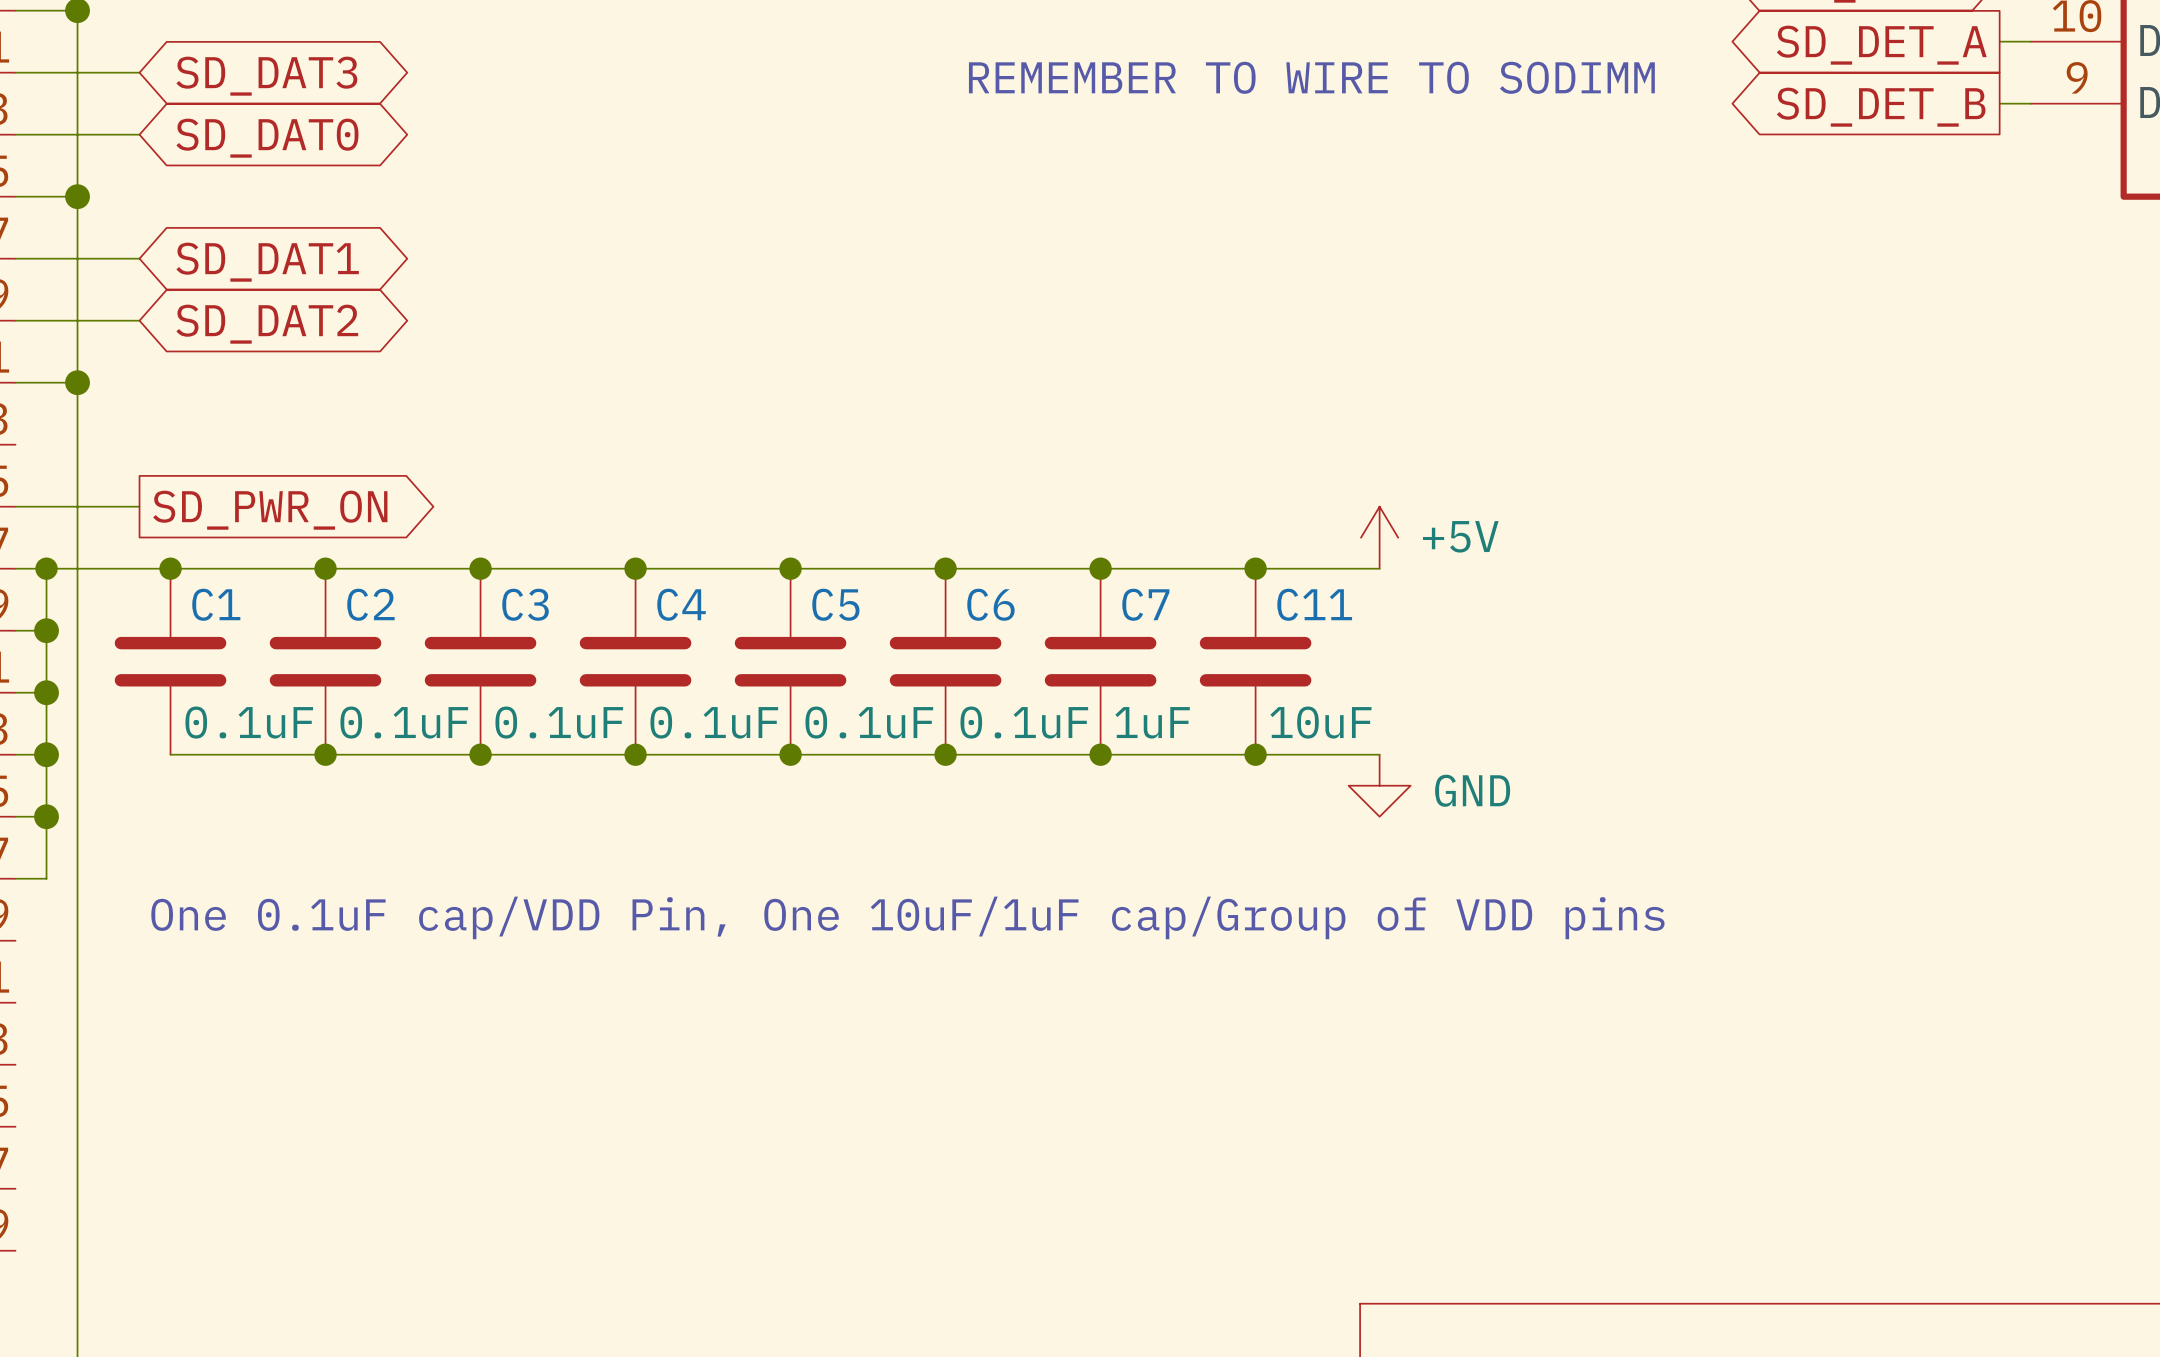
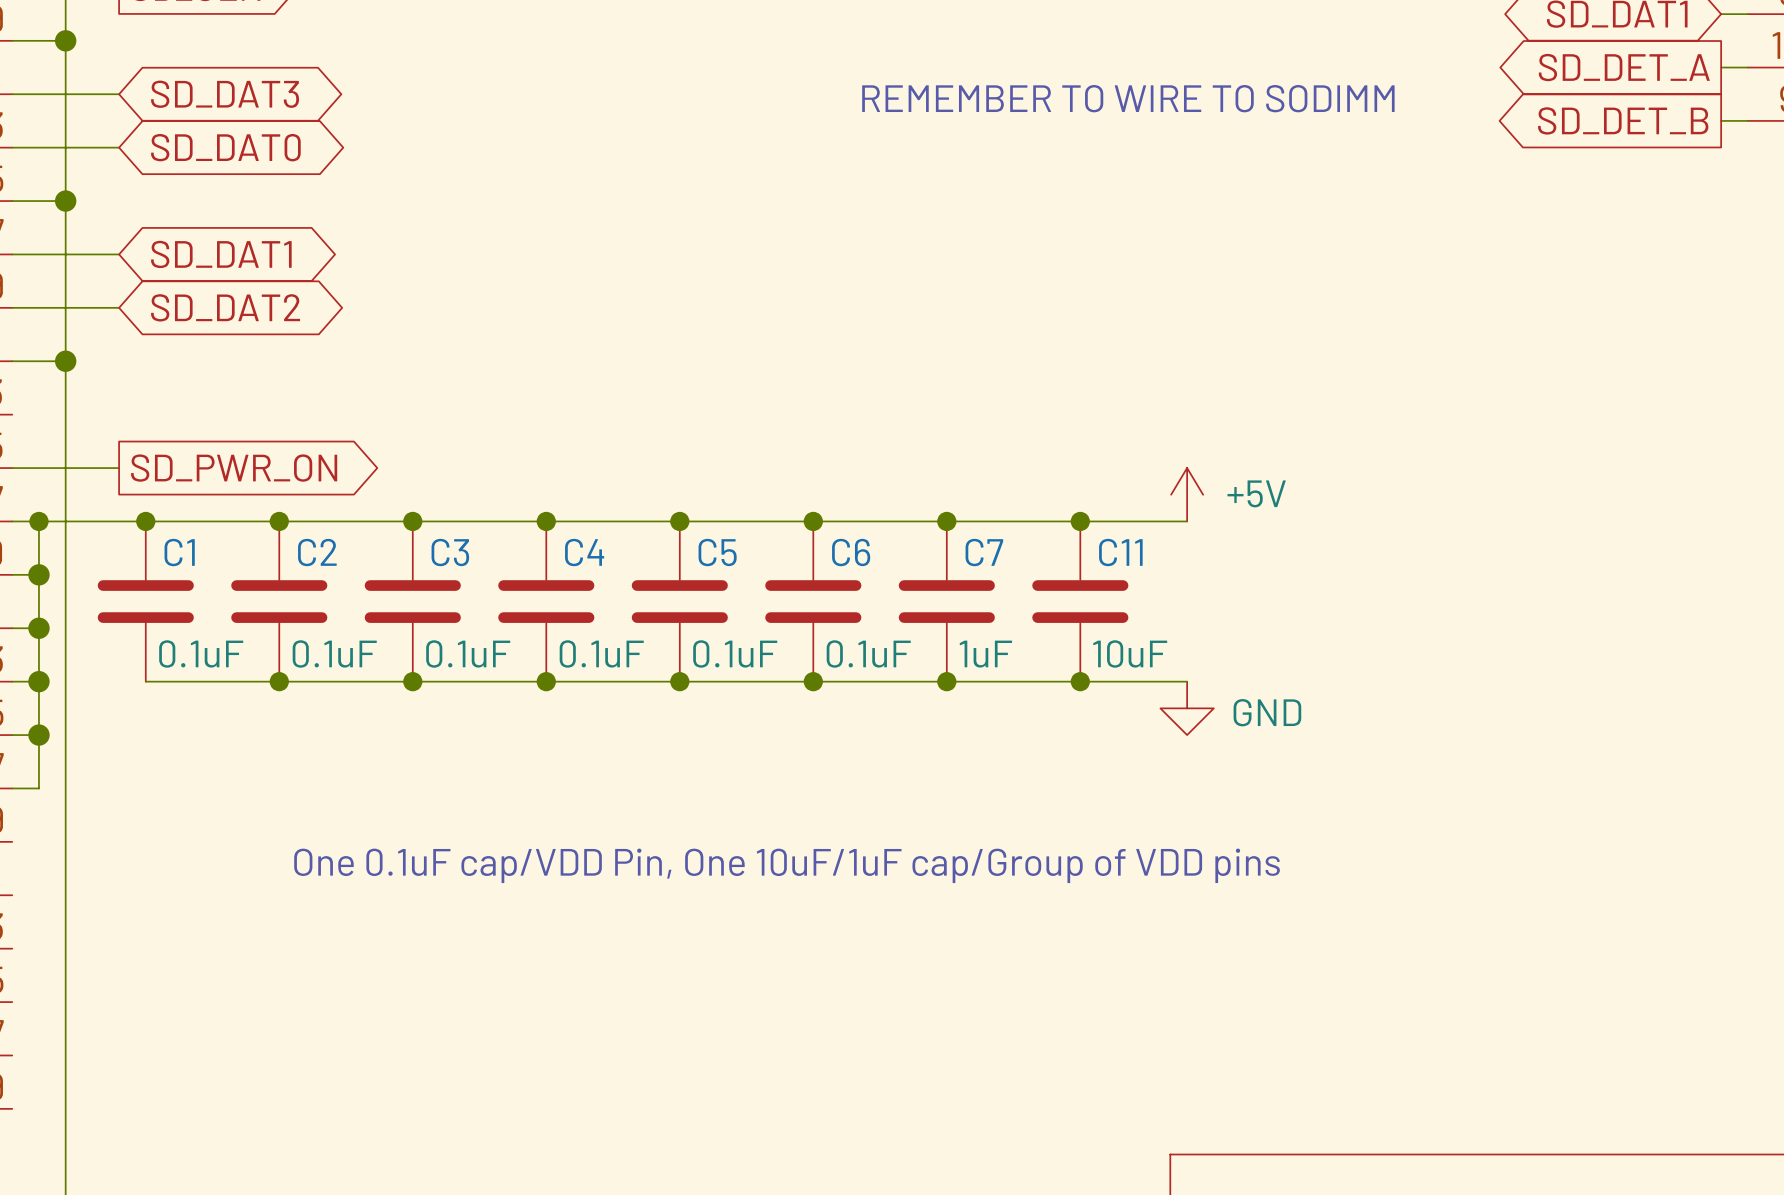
text position: One 0.1uF cap/VDD Pin, One 10uF/1uF cap/Group of VDD pins (907, 917) -> One 0.1uF cap/VDD Pin, One 10uF/1uF cap/Group of VDD pins (787, 865)

